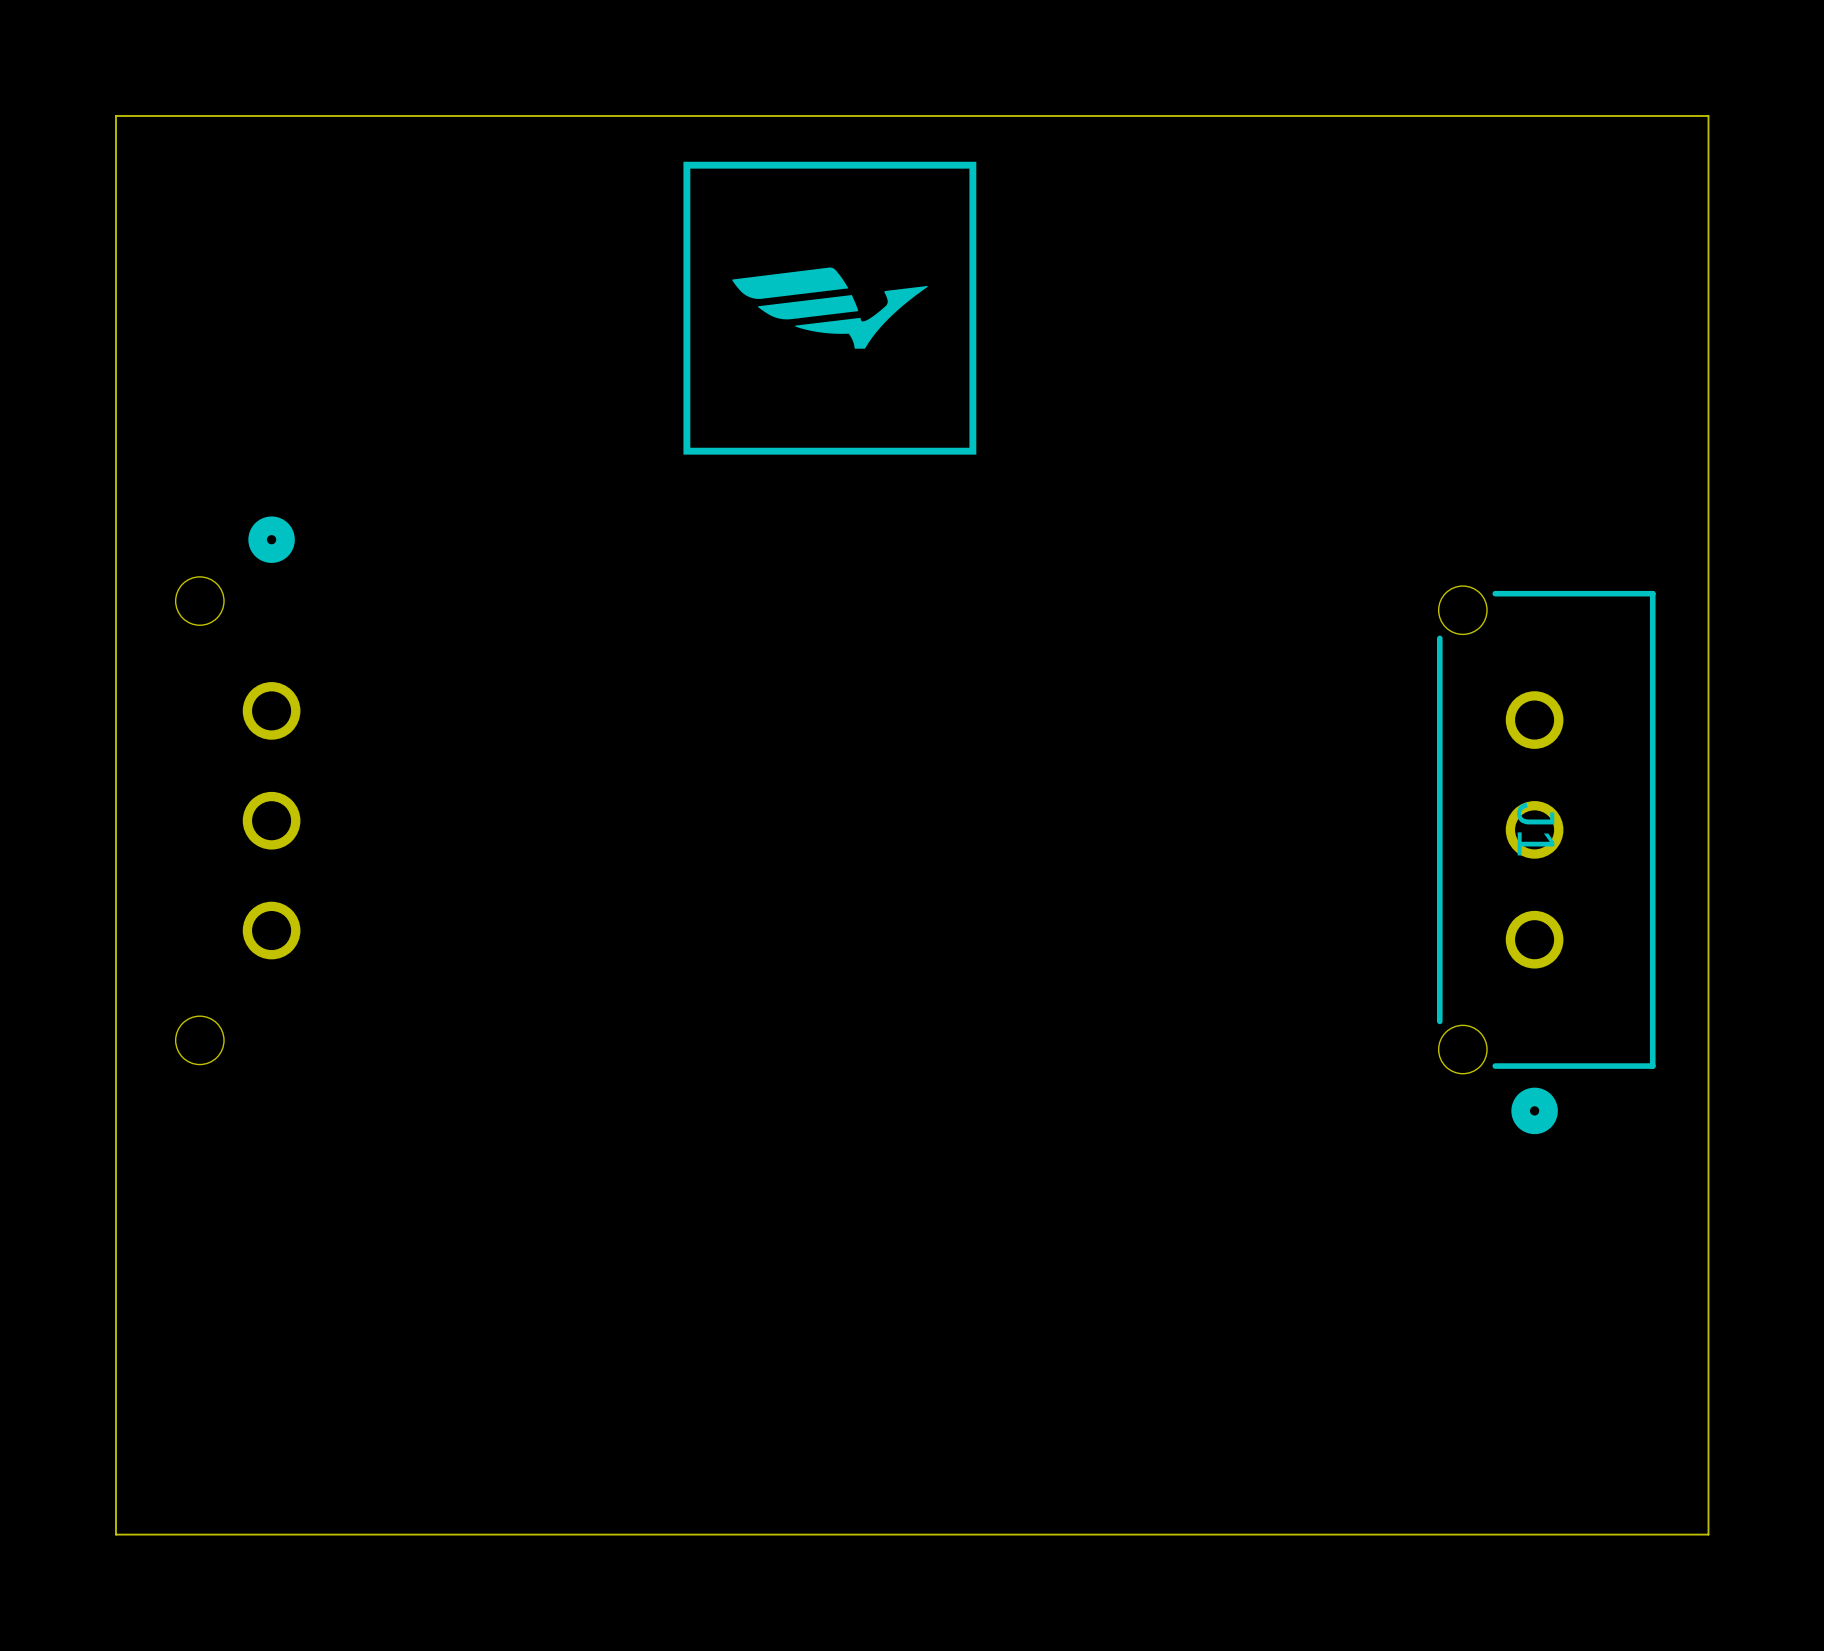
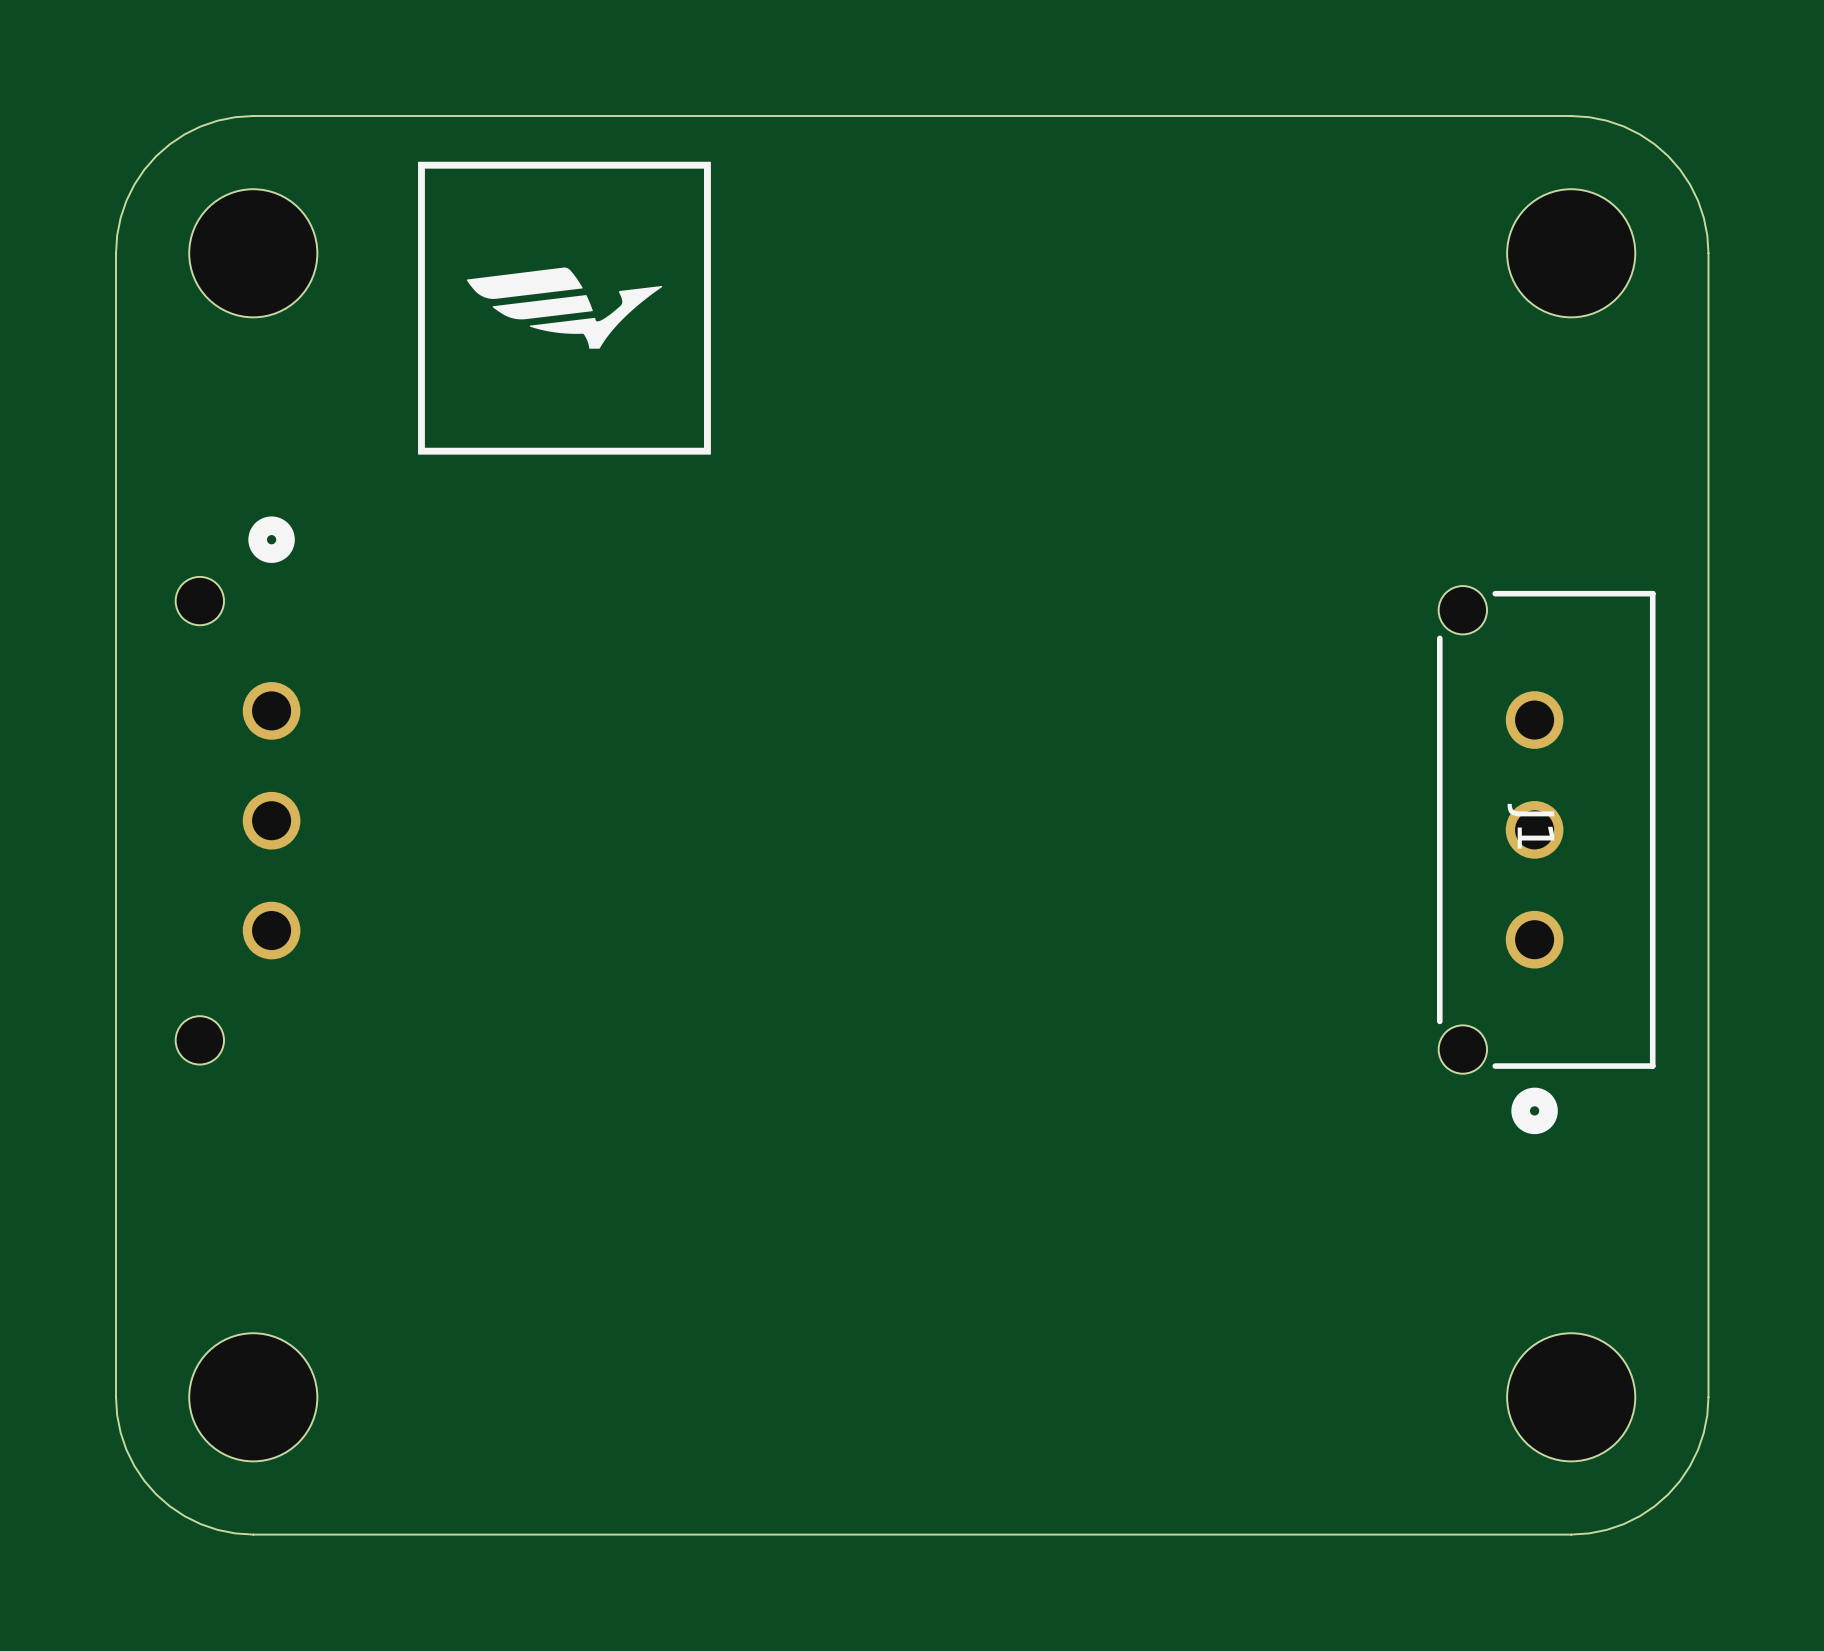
board edge: (253, 116) (116, 116) (116, 253) -> (253, 116) (217, 120) (200, 126) (169, 144) (156, 156) (144, 169) (126, 200) (120, 217) (116, 253)
board edge: (1571, 116) (1708, 116) (1708, 253) -> (1571, 116) (1589, 117) (1623, 126) (1639, 134) (1668, 156) (1690, 184) (1698, 200) (1703, 217) (1708, 253)
part: none -> (253, 253)
part: none -> (1571, 253)
drawing position: (829, 308) -> (564, 308)
board edge: (116, 1397) (116, 1534) (253, 1534) -> (116, 1397) (120, 1432) (126, 1449) (134, 1465) (156, 1494) (169, 1506) (200, 1524) (217, 1529) (253, 1534)
part: none -> (253, 1397)
part: none -> (1571, 1397)
board edge: (1708, 1397) (1708, 1534) (1571, 1534) -> (1708, 1397) (1707, 1415) (1698, 1449) (1690, 1465) (1668, 1494) (1654, 1506) (1623, 1524) (1606, 1529) (1571, 1534)

